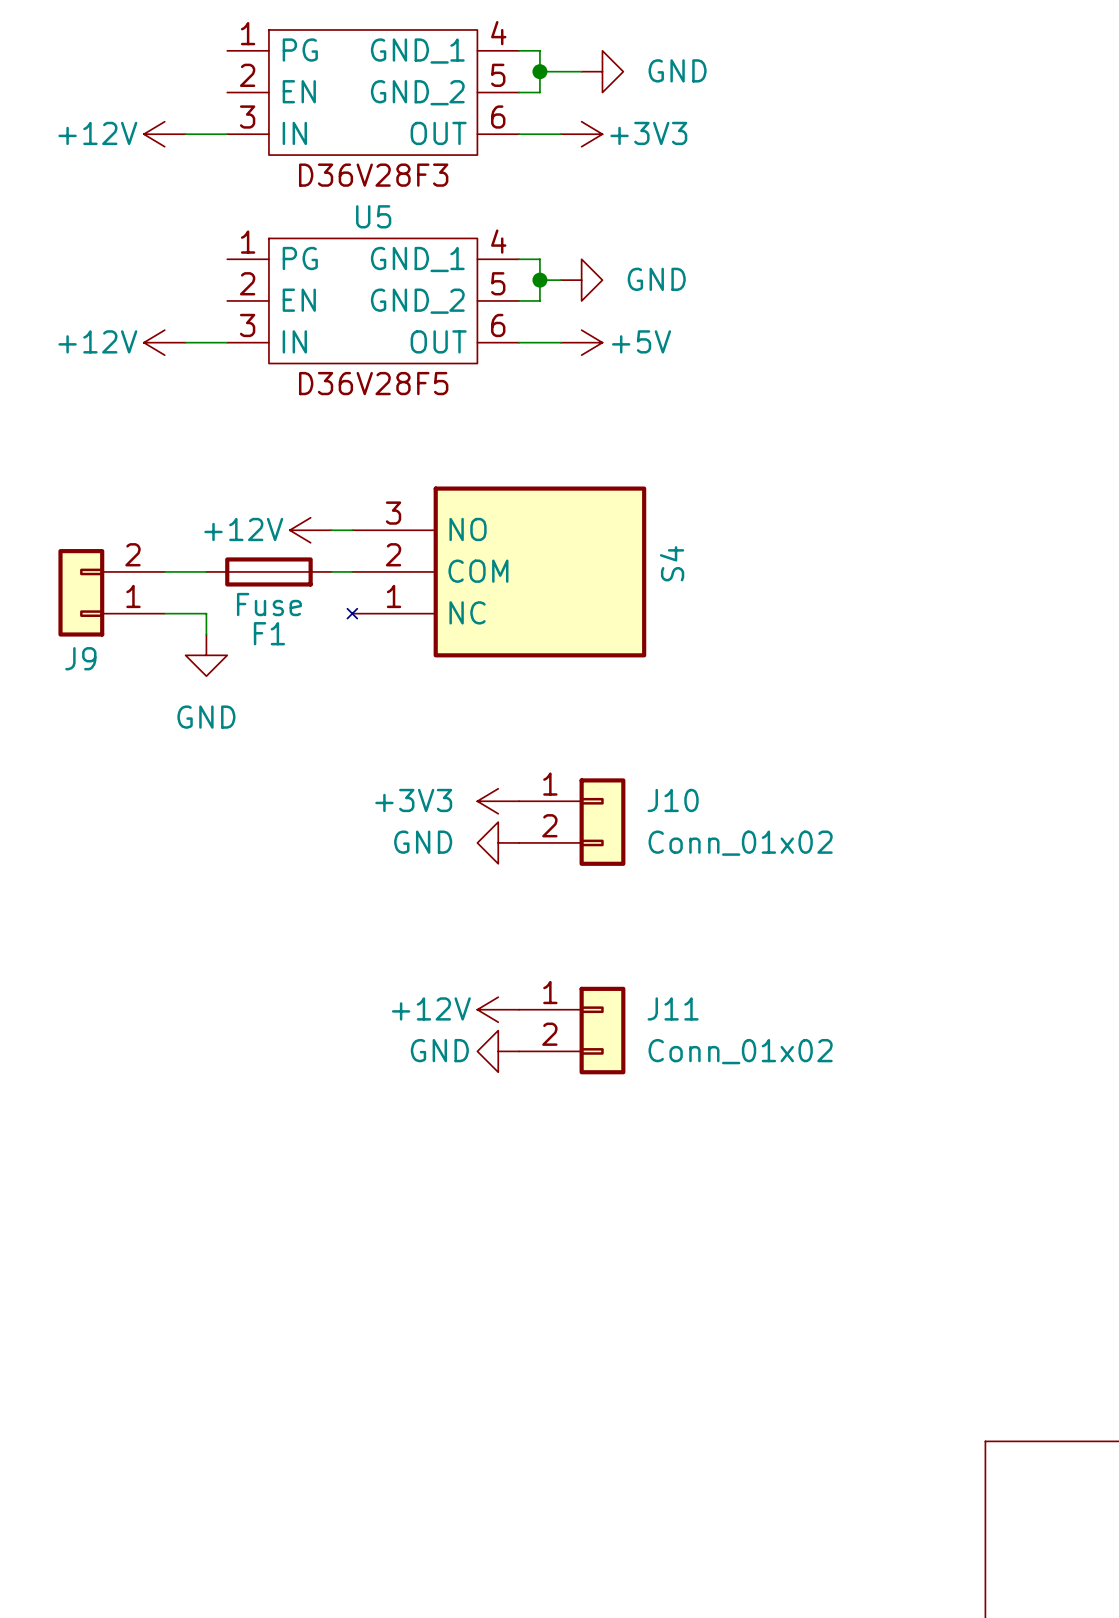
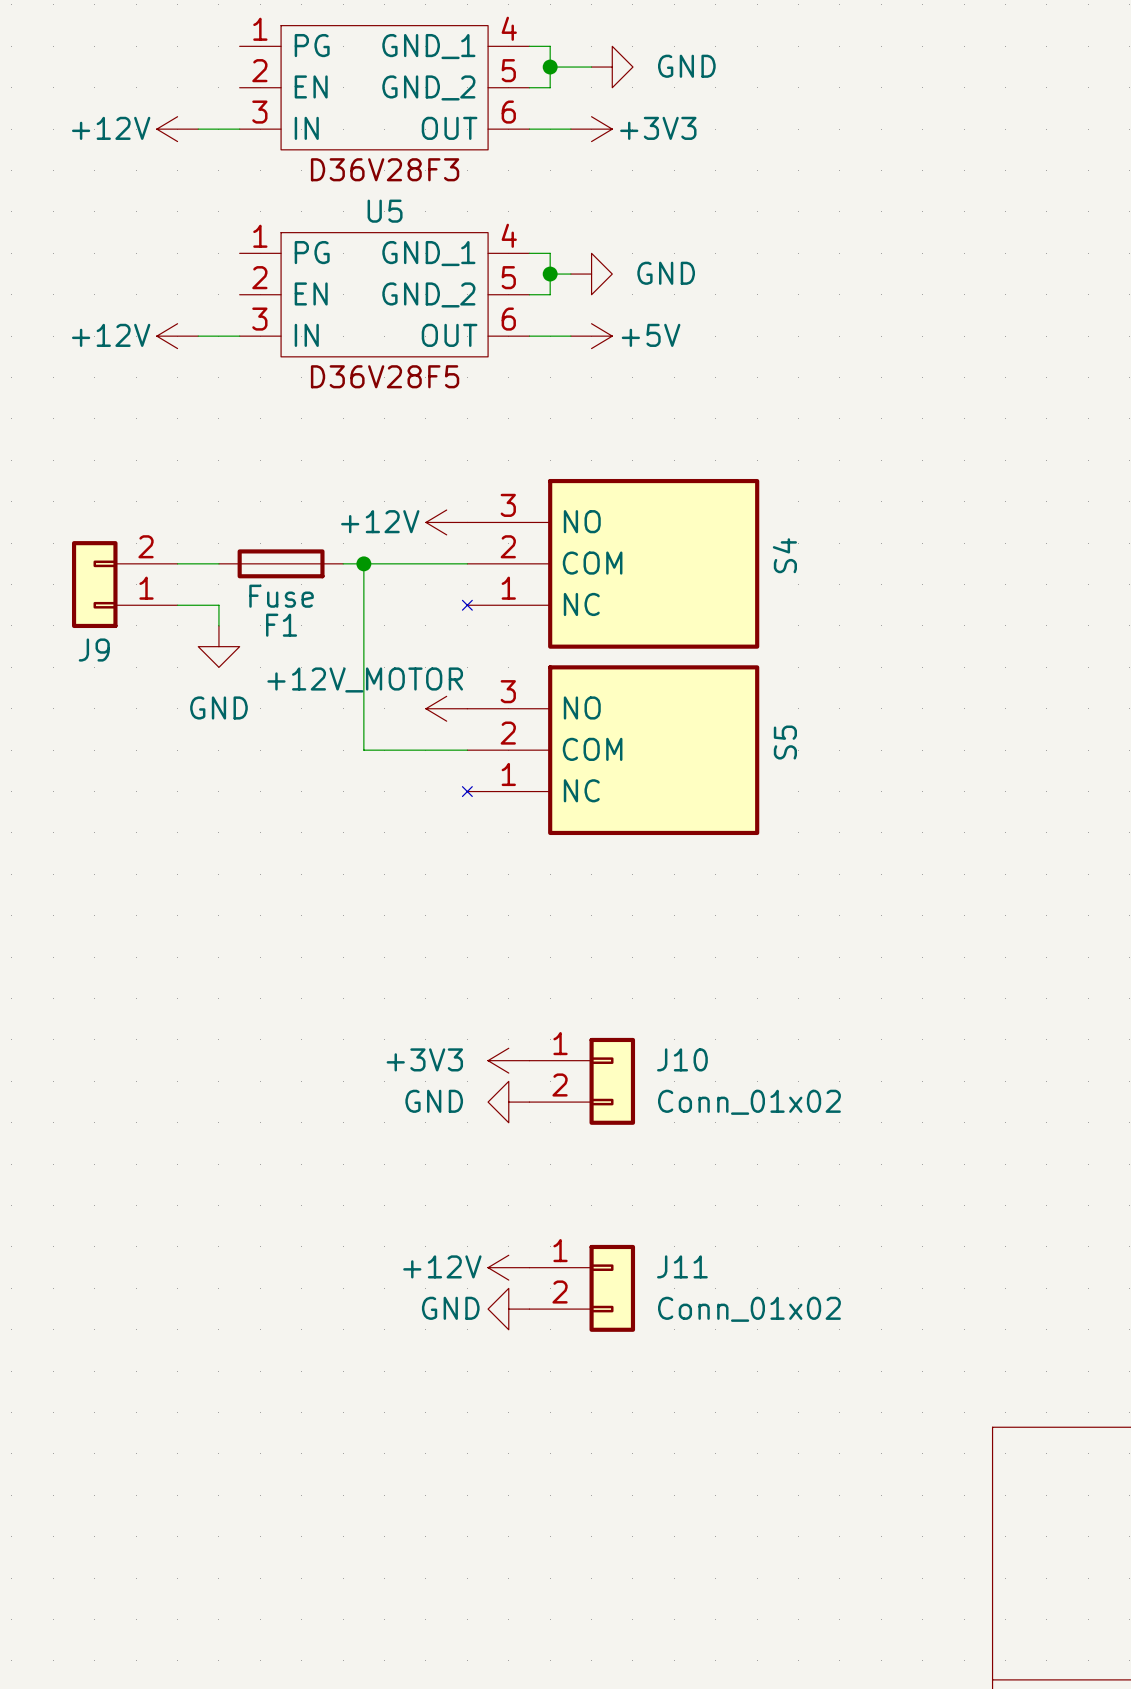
power symbol position: +12V (310, 530) -> +12V (446, 522)
wire: (331, 530) (352, 530) -> none
junction: none -> (363, 563)
wire: none -> (467, 563) (363, 563) (363, 750) (467, 750)
S4 position: (496, 571) -> (610, 563)
power symbol: none -> +12V_MOTOR (446, 708)
S5: none -> (610, 750)
power symbol position: +3V3 (498, 801) -> +3V3 (508, 1060)
J10 position: (572, 822) -> (582, 1081)
power symbol: GND (498, 842) -> none
power symbol: +12V (498, 1009) -> none
J11 position: (572, 1030) -> (582, 1288)
power symbol text position: GND (439, 1050) -> GND (434, 1101)
power symbol position: GND (498, 1051) -> GND (508, 1102)
power symbol: none -> +12V (508, 1267)
power symbol: none -> GND (508, 1309)

